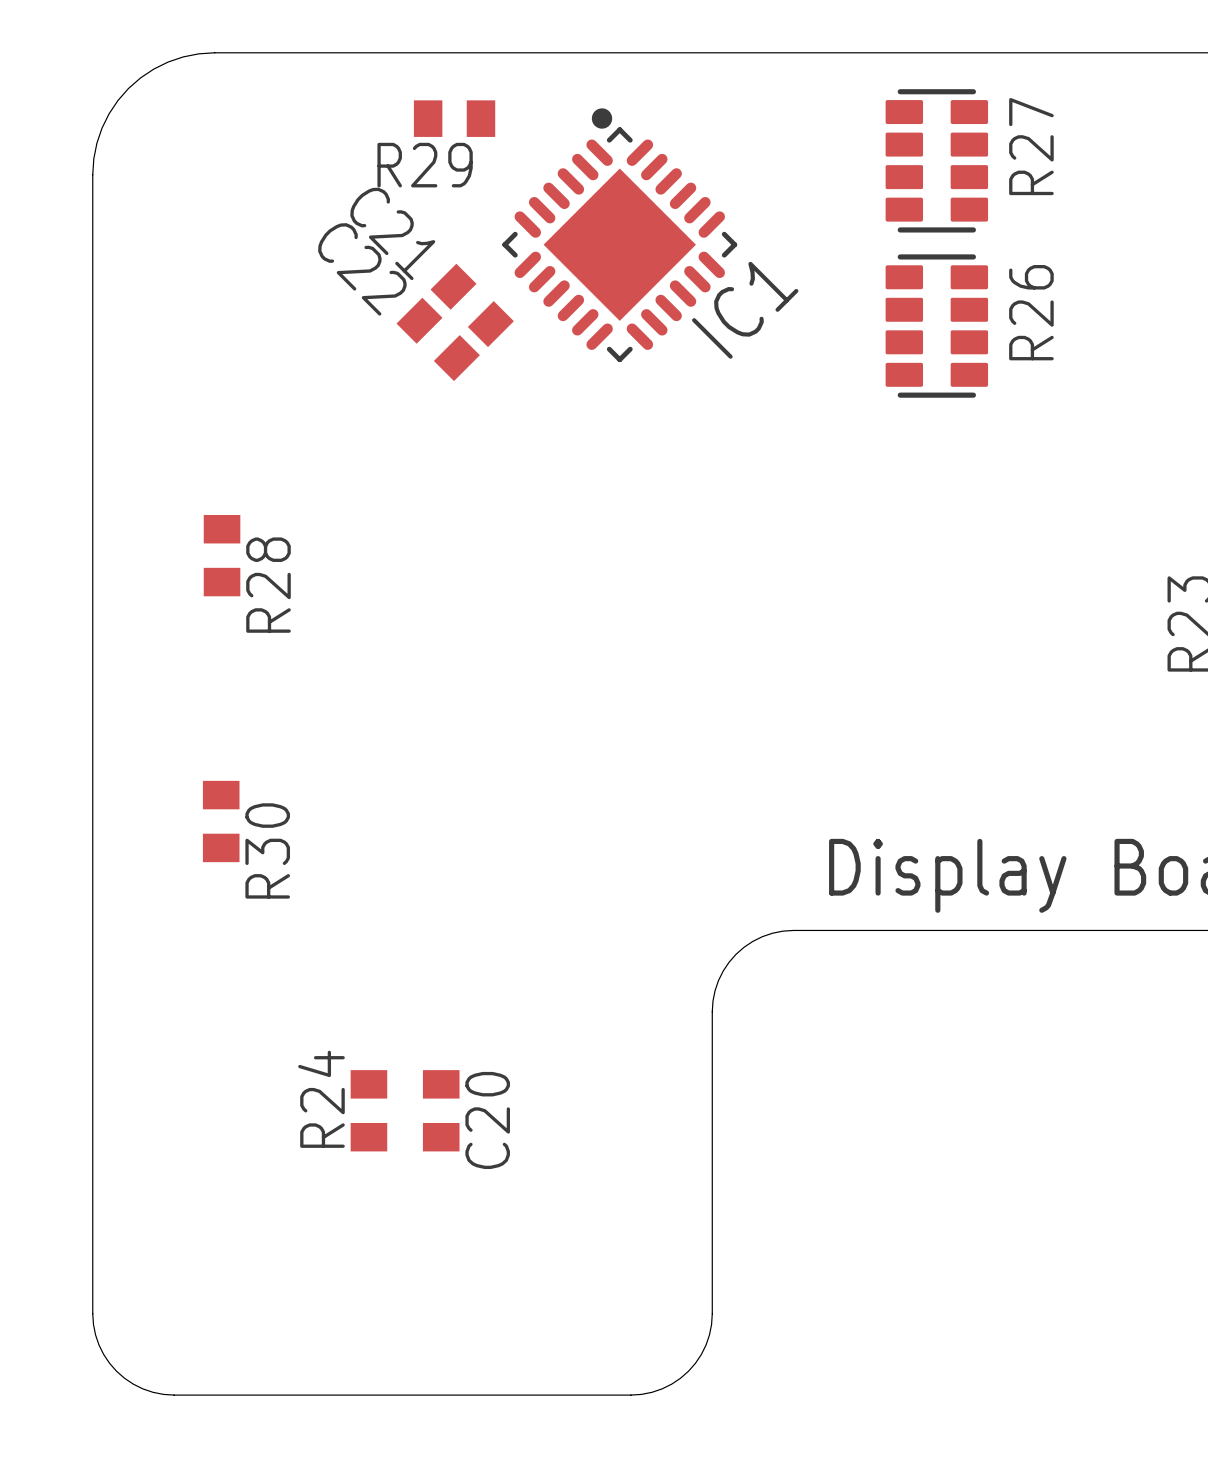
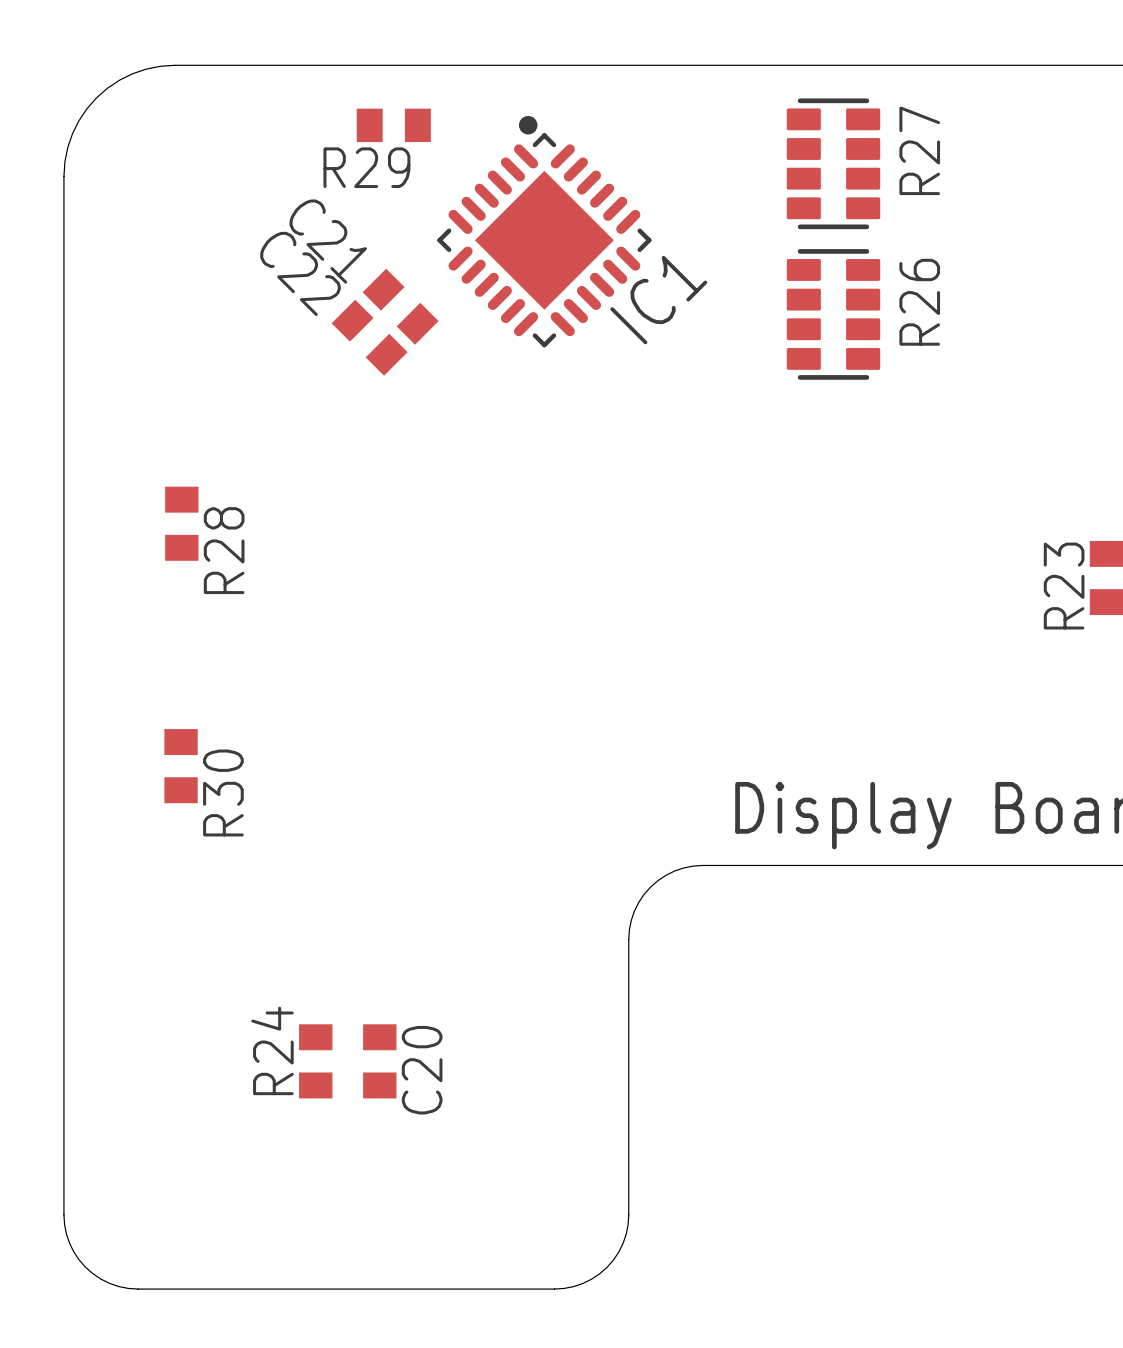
C21 position: (472, 305) -> (400, 306)
C22 position: (438, 339) -> (369, 337)
R24 position: (368, 1110) -> (315, 1061)
C20 position: (441, 1110) -> (379, 1061)

